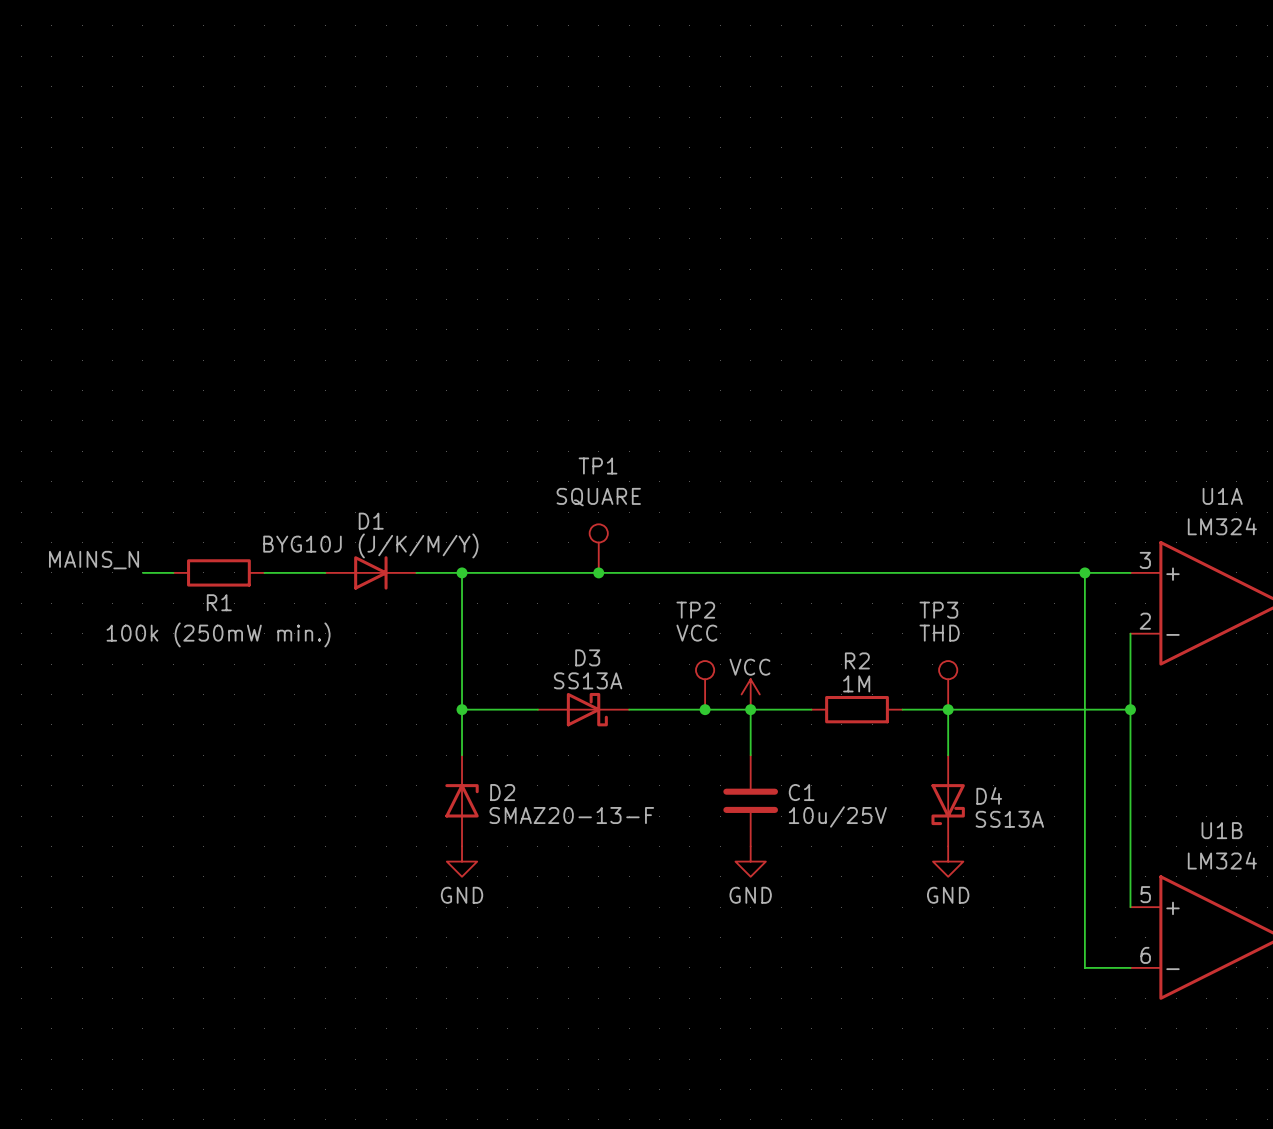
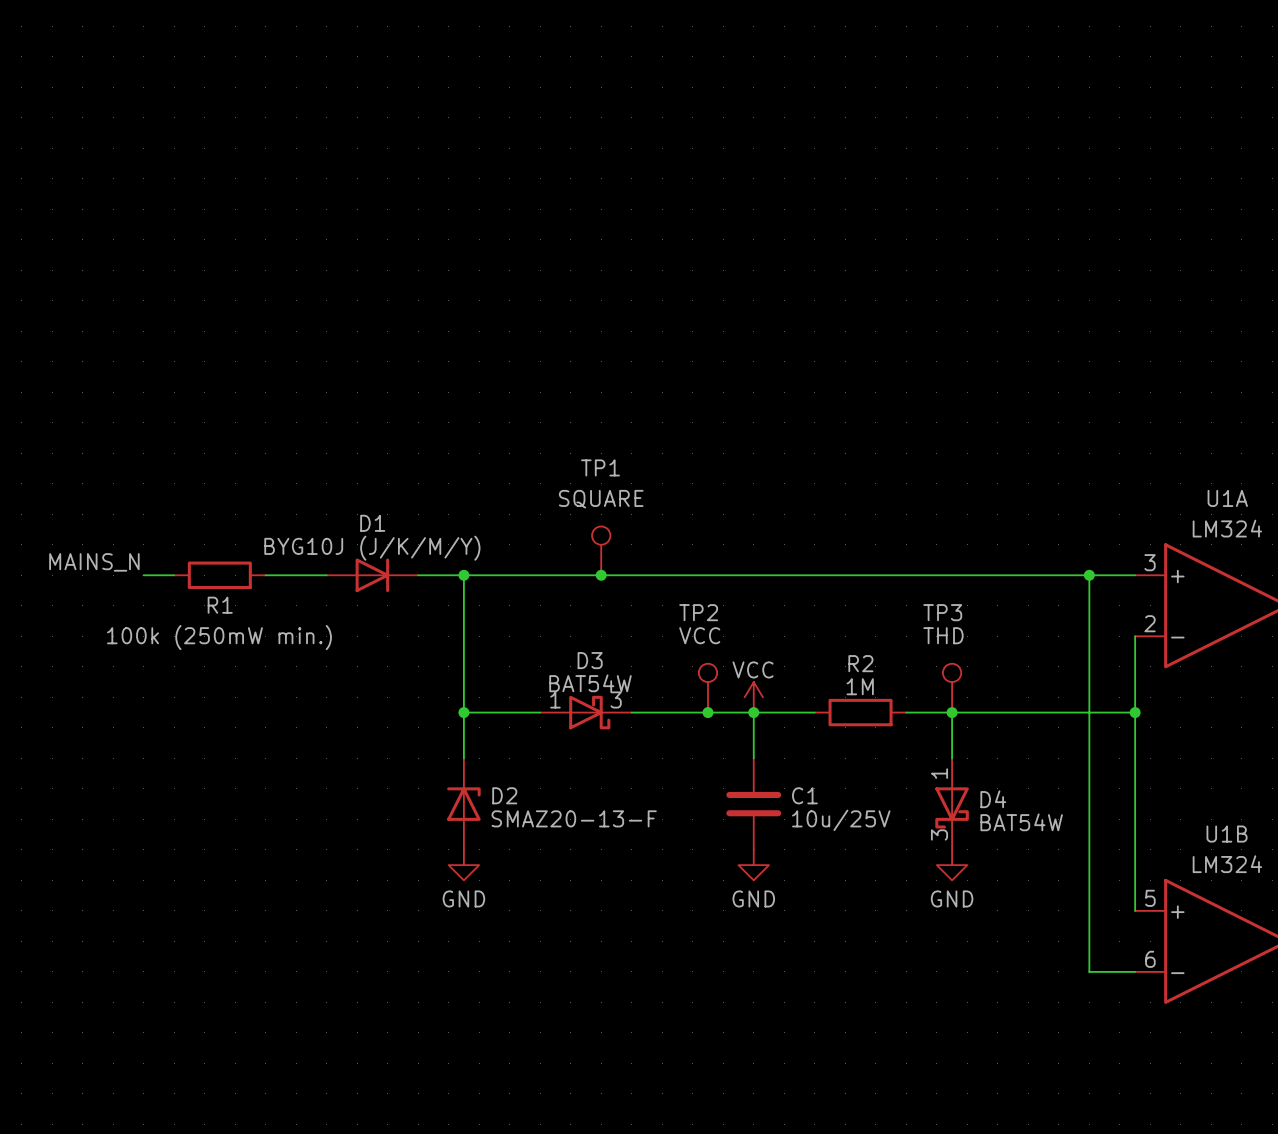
D3 value: SS13A (588, 680) -> BAT54W (590, 683)
D3 pin number: none -> 1 (555, 699)
D3 pin number: none -> 3 (616, 699)
D4 pin number: none -> 1 (939, 773)
D4 value: SS13A (1009, 819) -> BAT54W (1021, 822)
D4 pin number: none -> 3 (939, 834)

